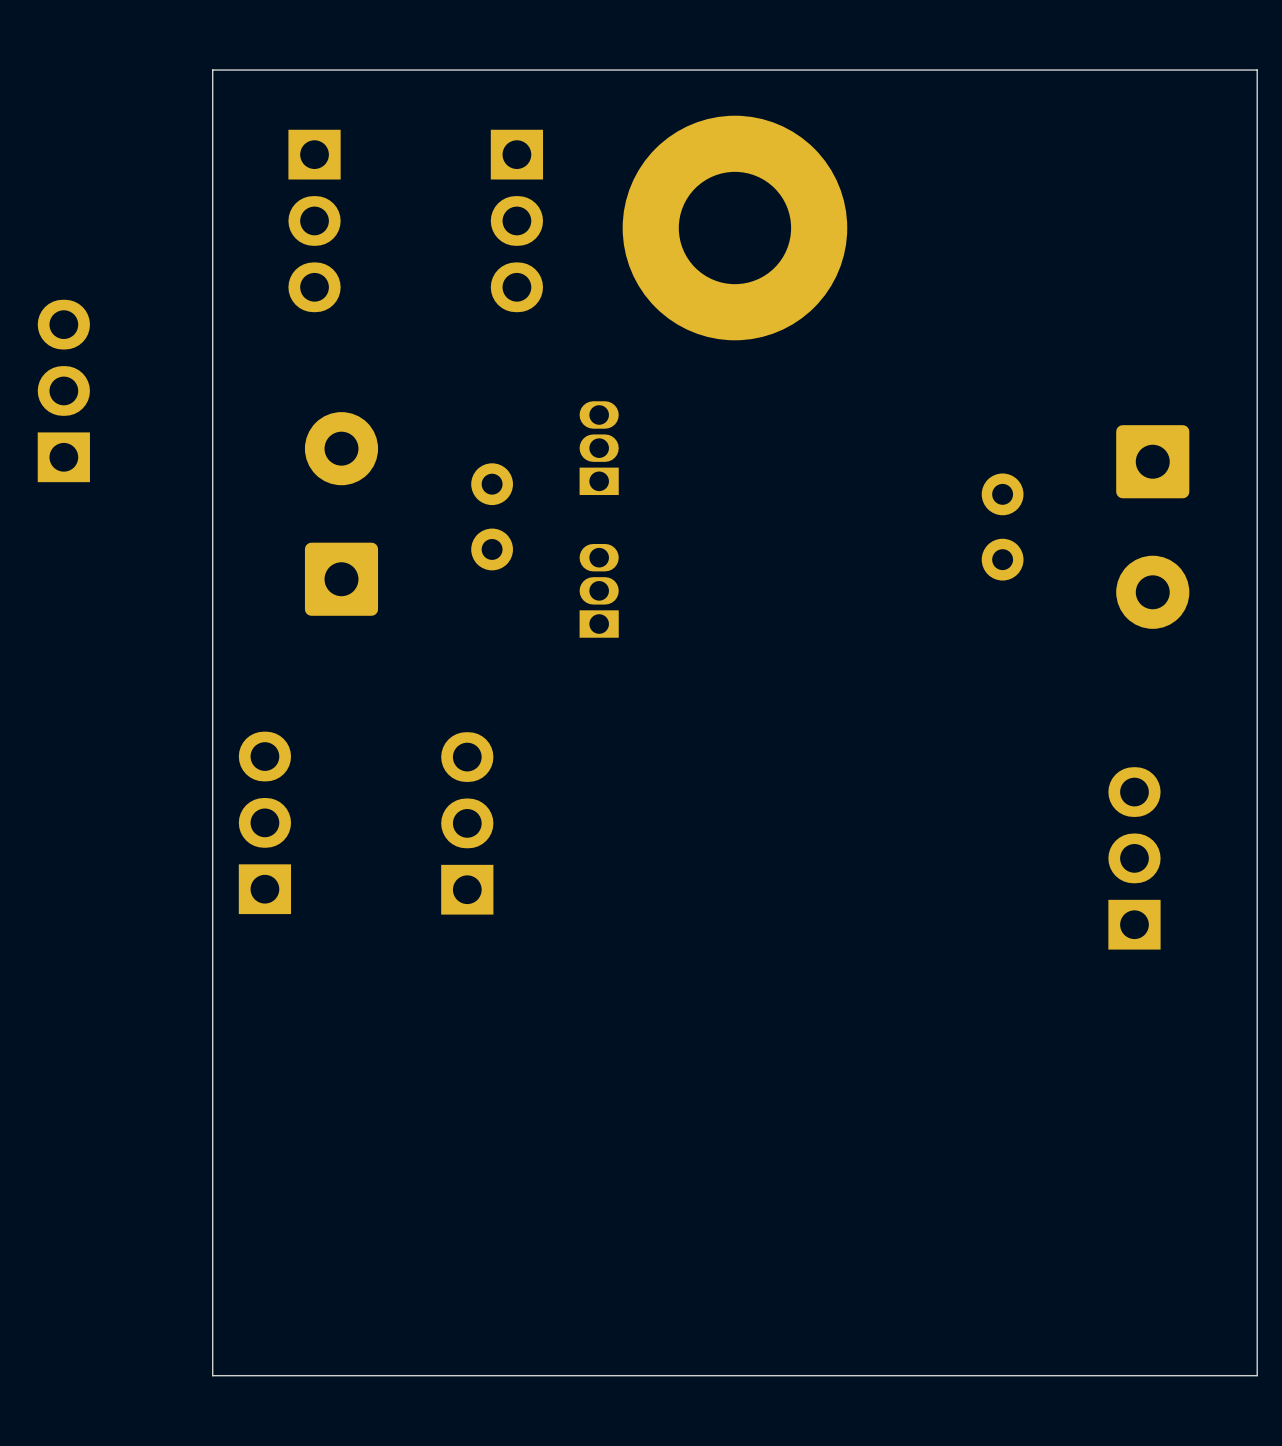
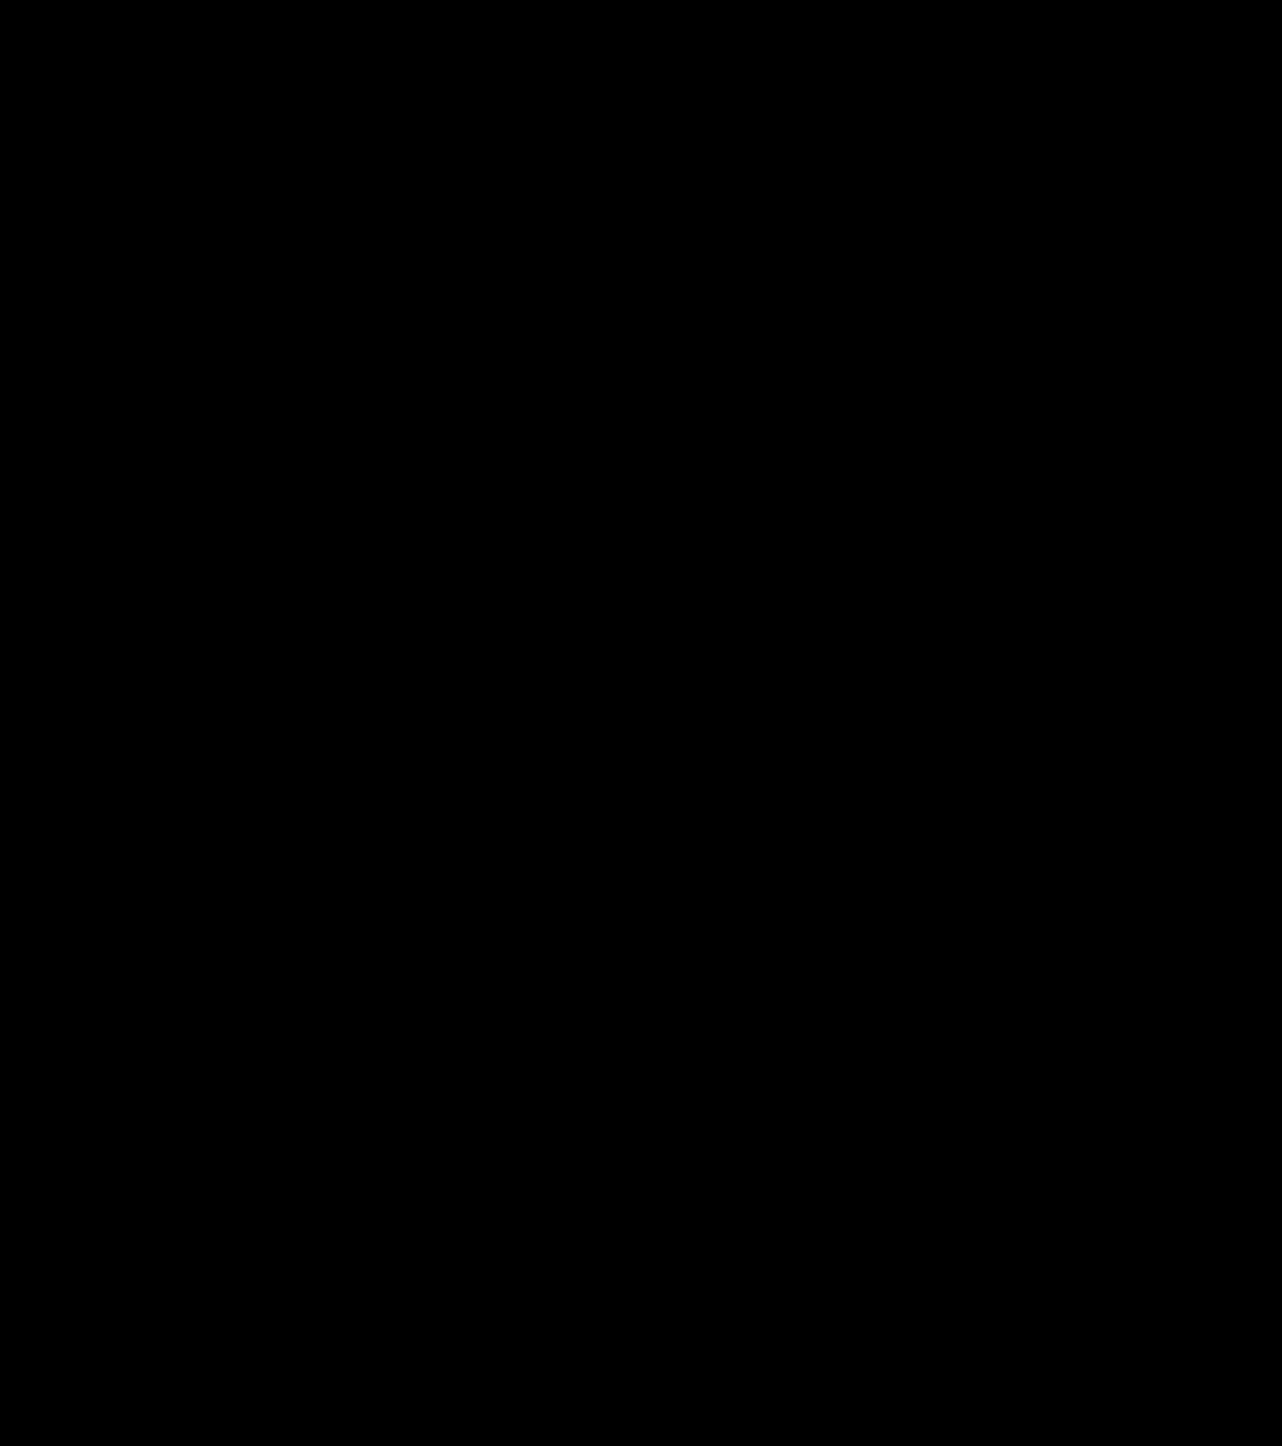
board edge: (1257, 70) (212, 70) (212, 1375) (1257, 1375) (1257, 70) -> none
part: (314, 220) -> none
part: (516, 220) -> none
part: (734, 228) -> none
part: (63, 390) -> none
part: (599, 448) -> none
part: (341, 513) -> none
part: (492, 516) -> none
part: (1002, 527) -> none
part: (1152, 527) -> none
part: (599, 590) -> none
part: (264, 822) -> none
part: (467, 823) -> none
part: (1134, 858) -> none

